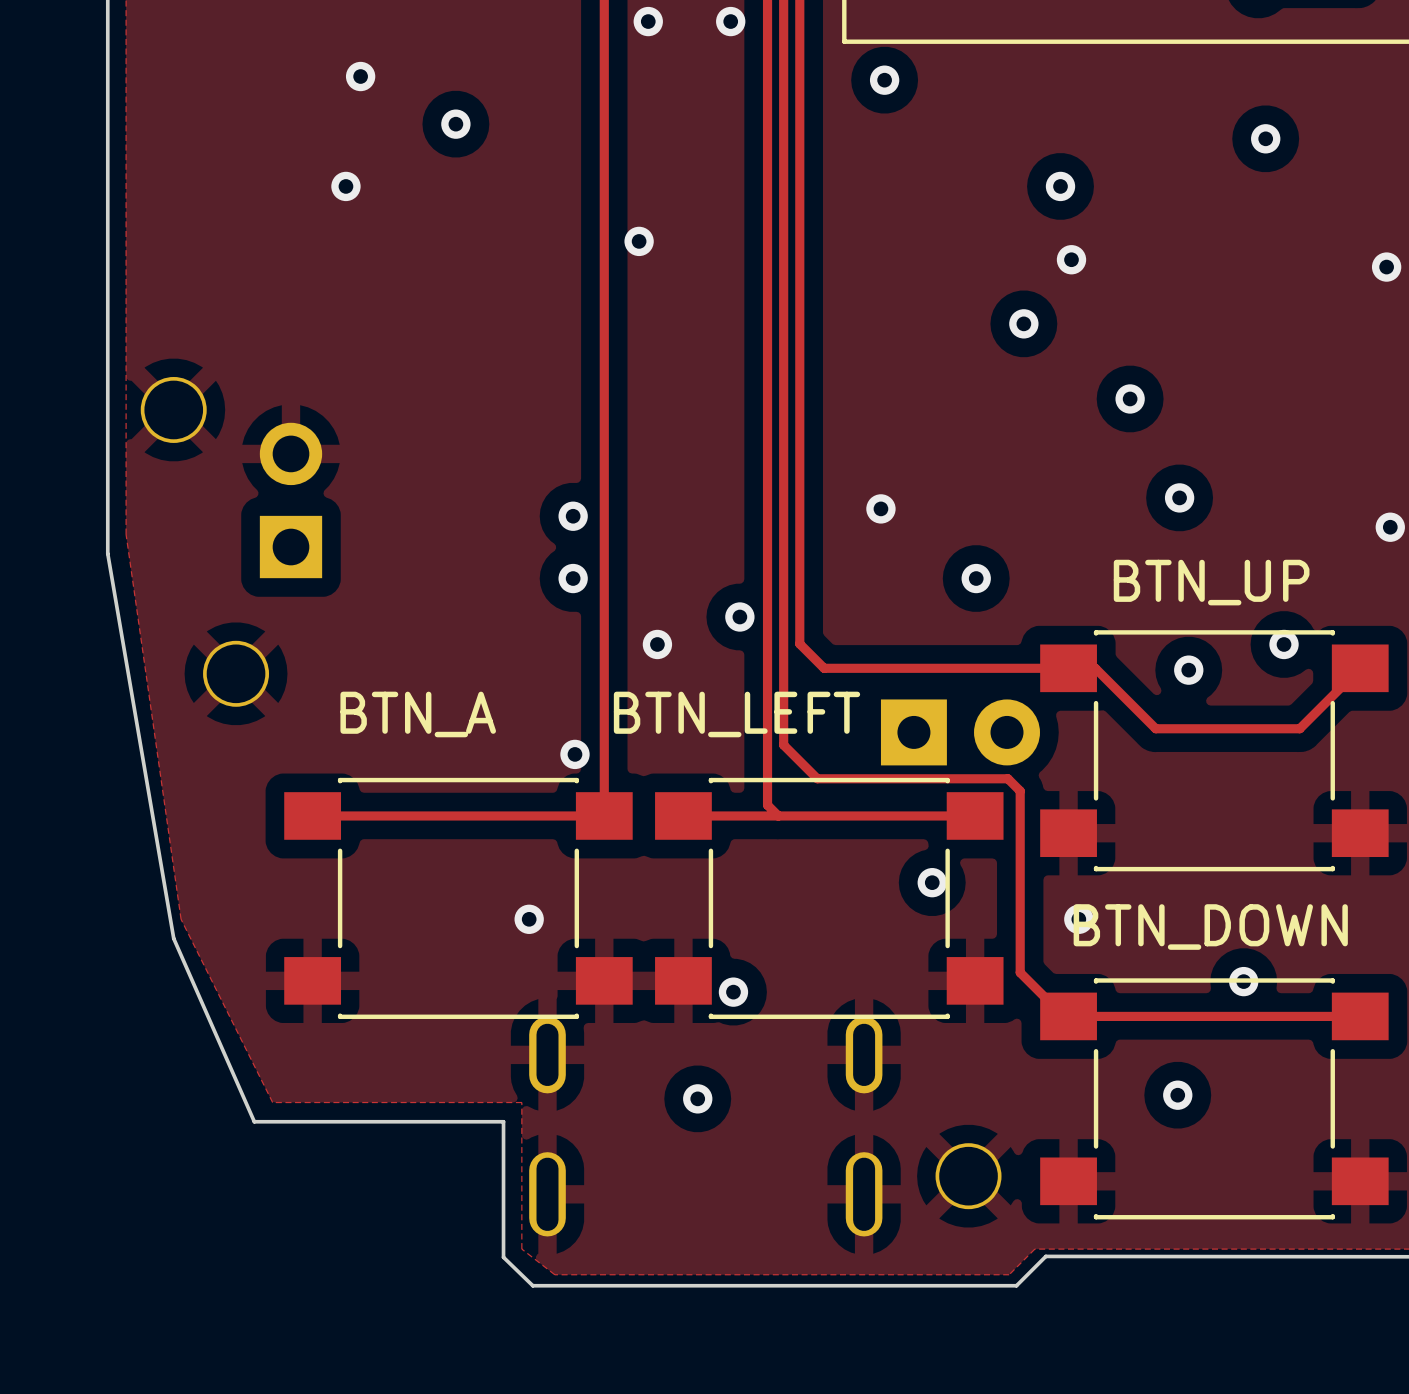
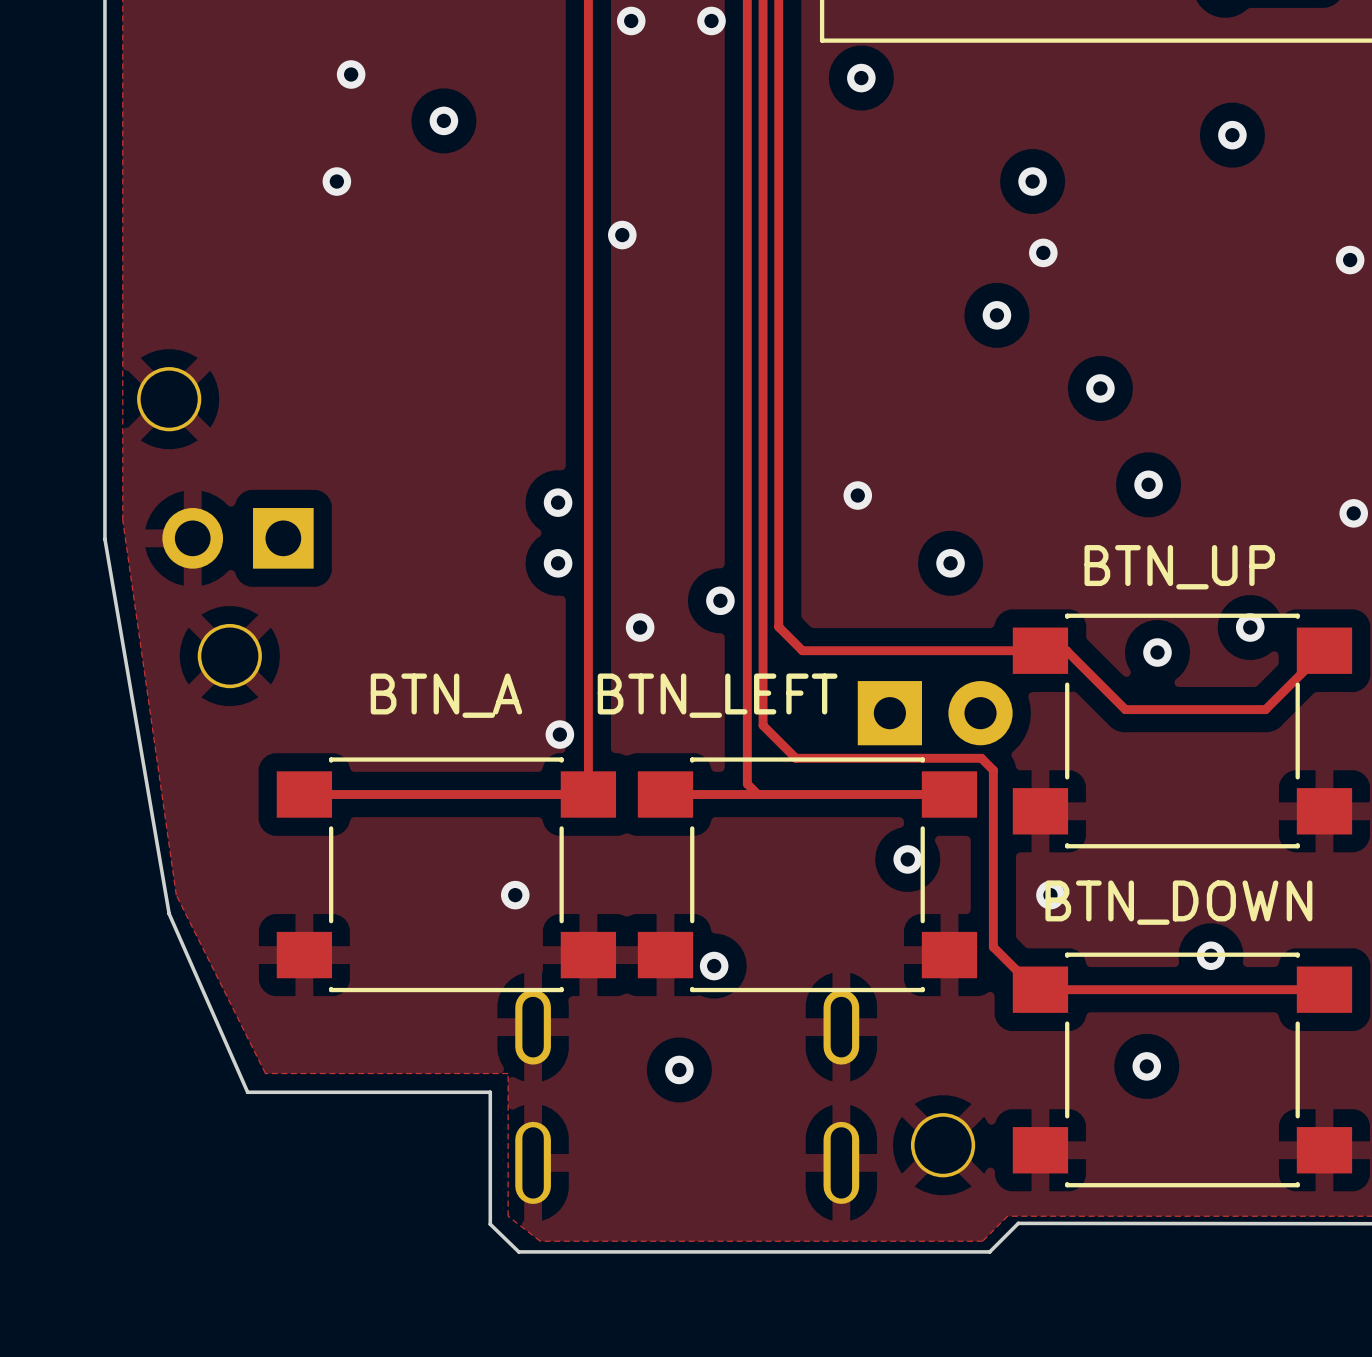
part rotation: 0° (291, 500) -> 90° counterclockwise (238, 538)
part value position: BTN_A (418, 714) -> BTN_A (446, 695)

